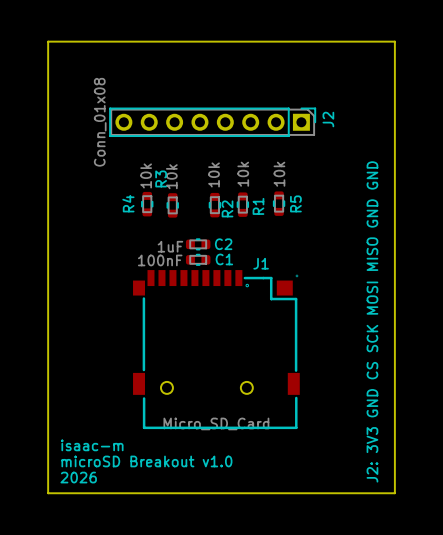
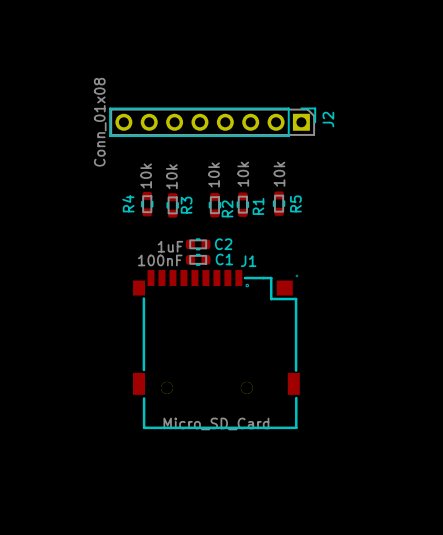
board edge: (48, 41) (394, 41) (394, 493) (48, 493) (48, 41) -> none
R3 name position: R3 (161, 178) -> R3 (186, 205)
J1 footprint: [133, 270, 300, 430] -> [133, 270, 300, 430]
text: J2: 3V3 GND CS SCK MOSI MISO GND GND (372, 321) -> none
text: isaac-m (92, 445) -> none
text: microSD Breakout v1.0 (146, 461) -> none
text: 2026 (78, 477) -> none

